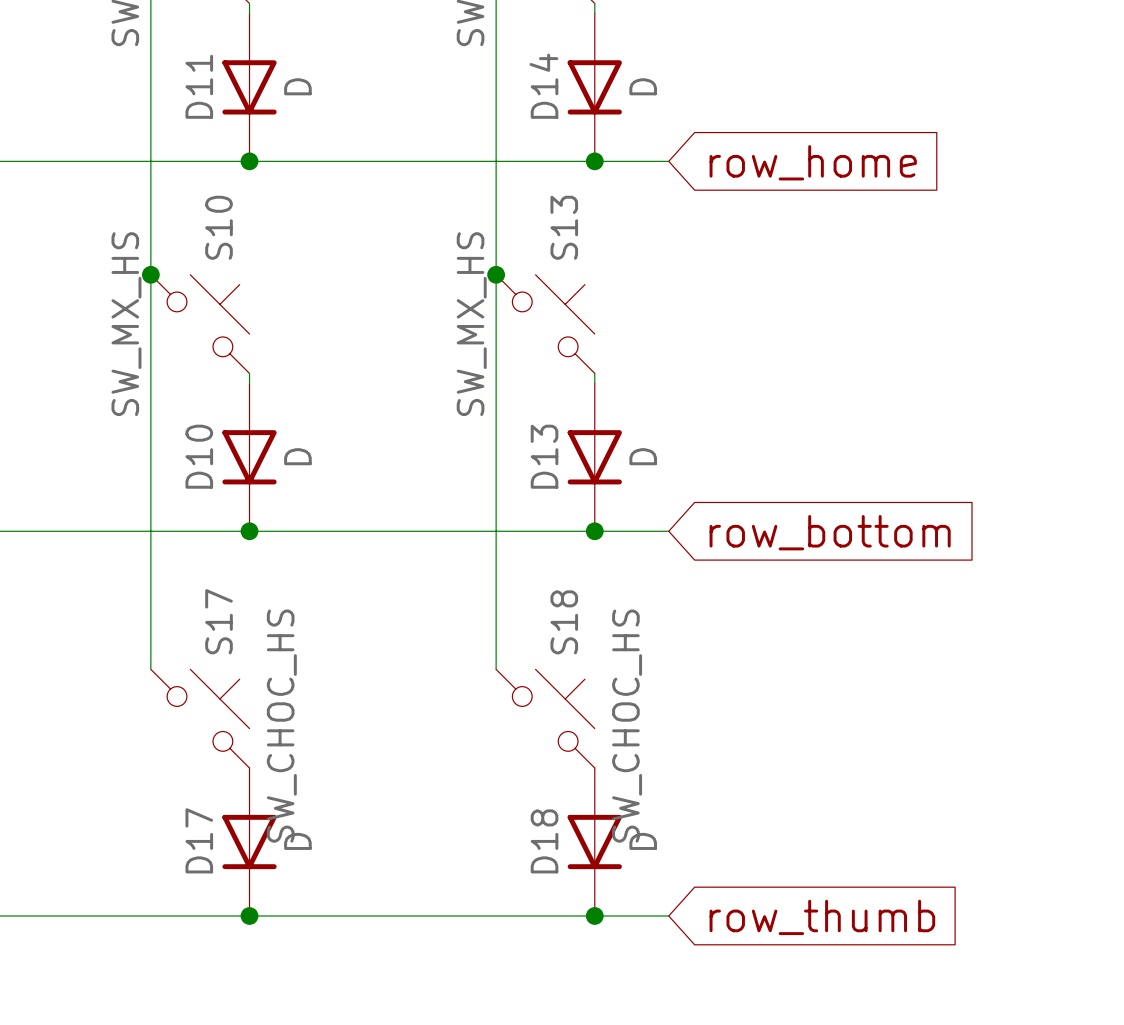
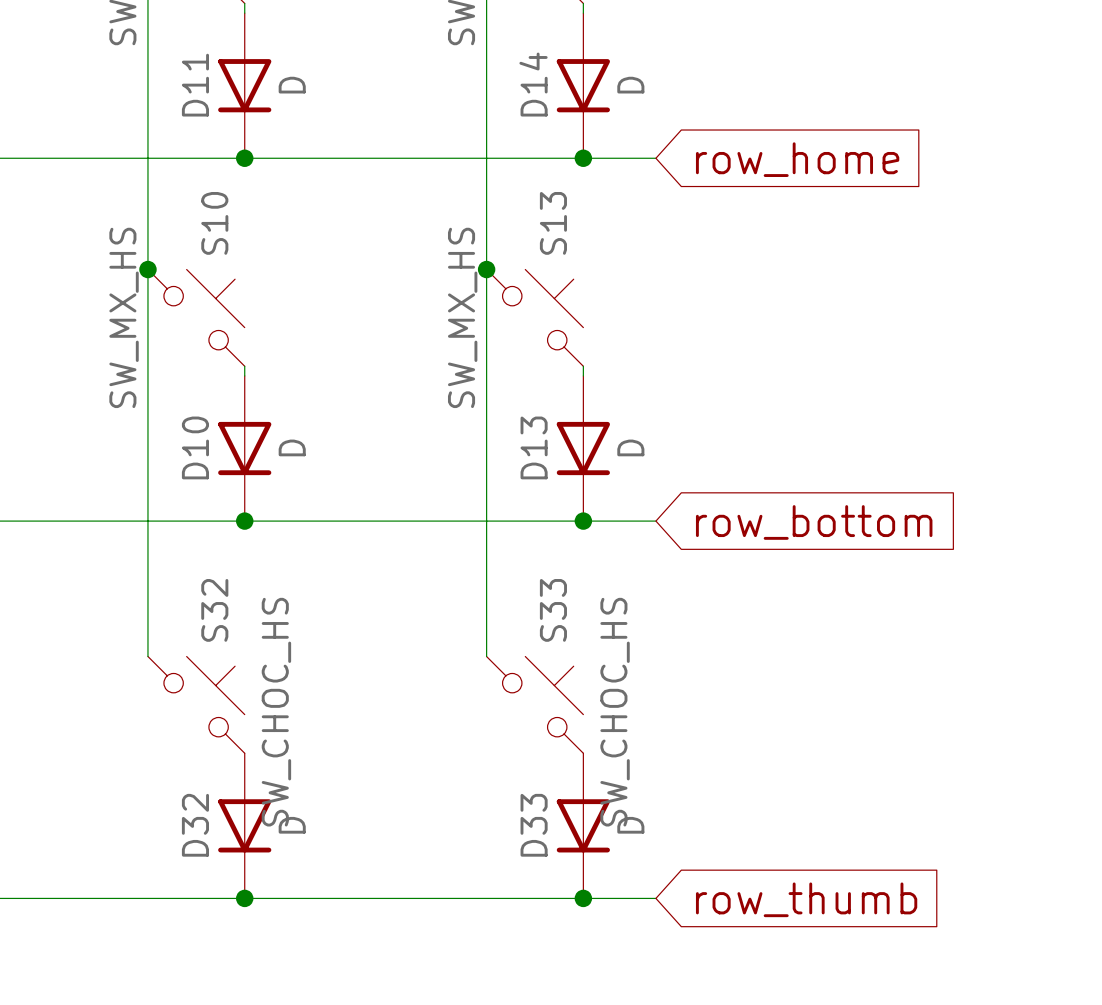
S17 name: S17 (219, 621) -> S32 (214, 610)
S18 name: S18 (564, 622) -> S33 (553, 610)
D17 name: D17 (199, 840) -> D32 (195, 825)
D18 name: D18 (544, 841) -> D33 (534, 825)

